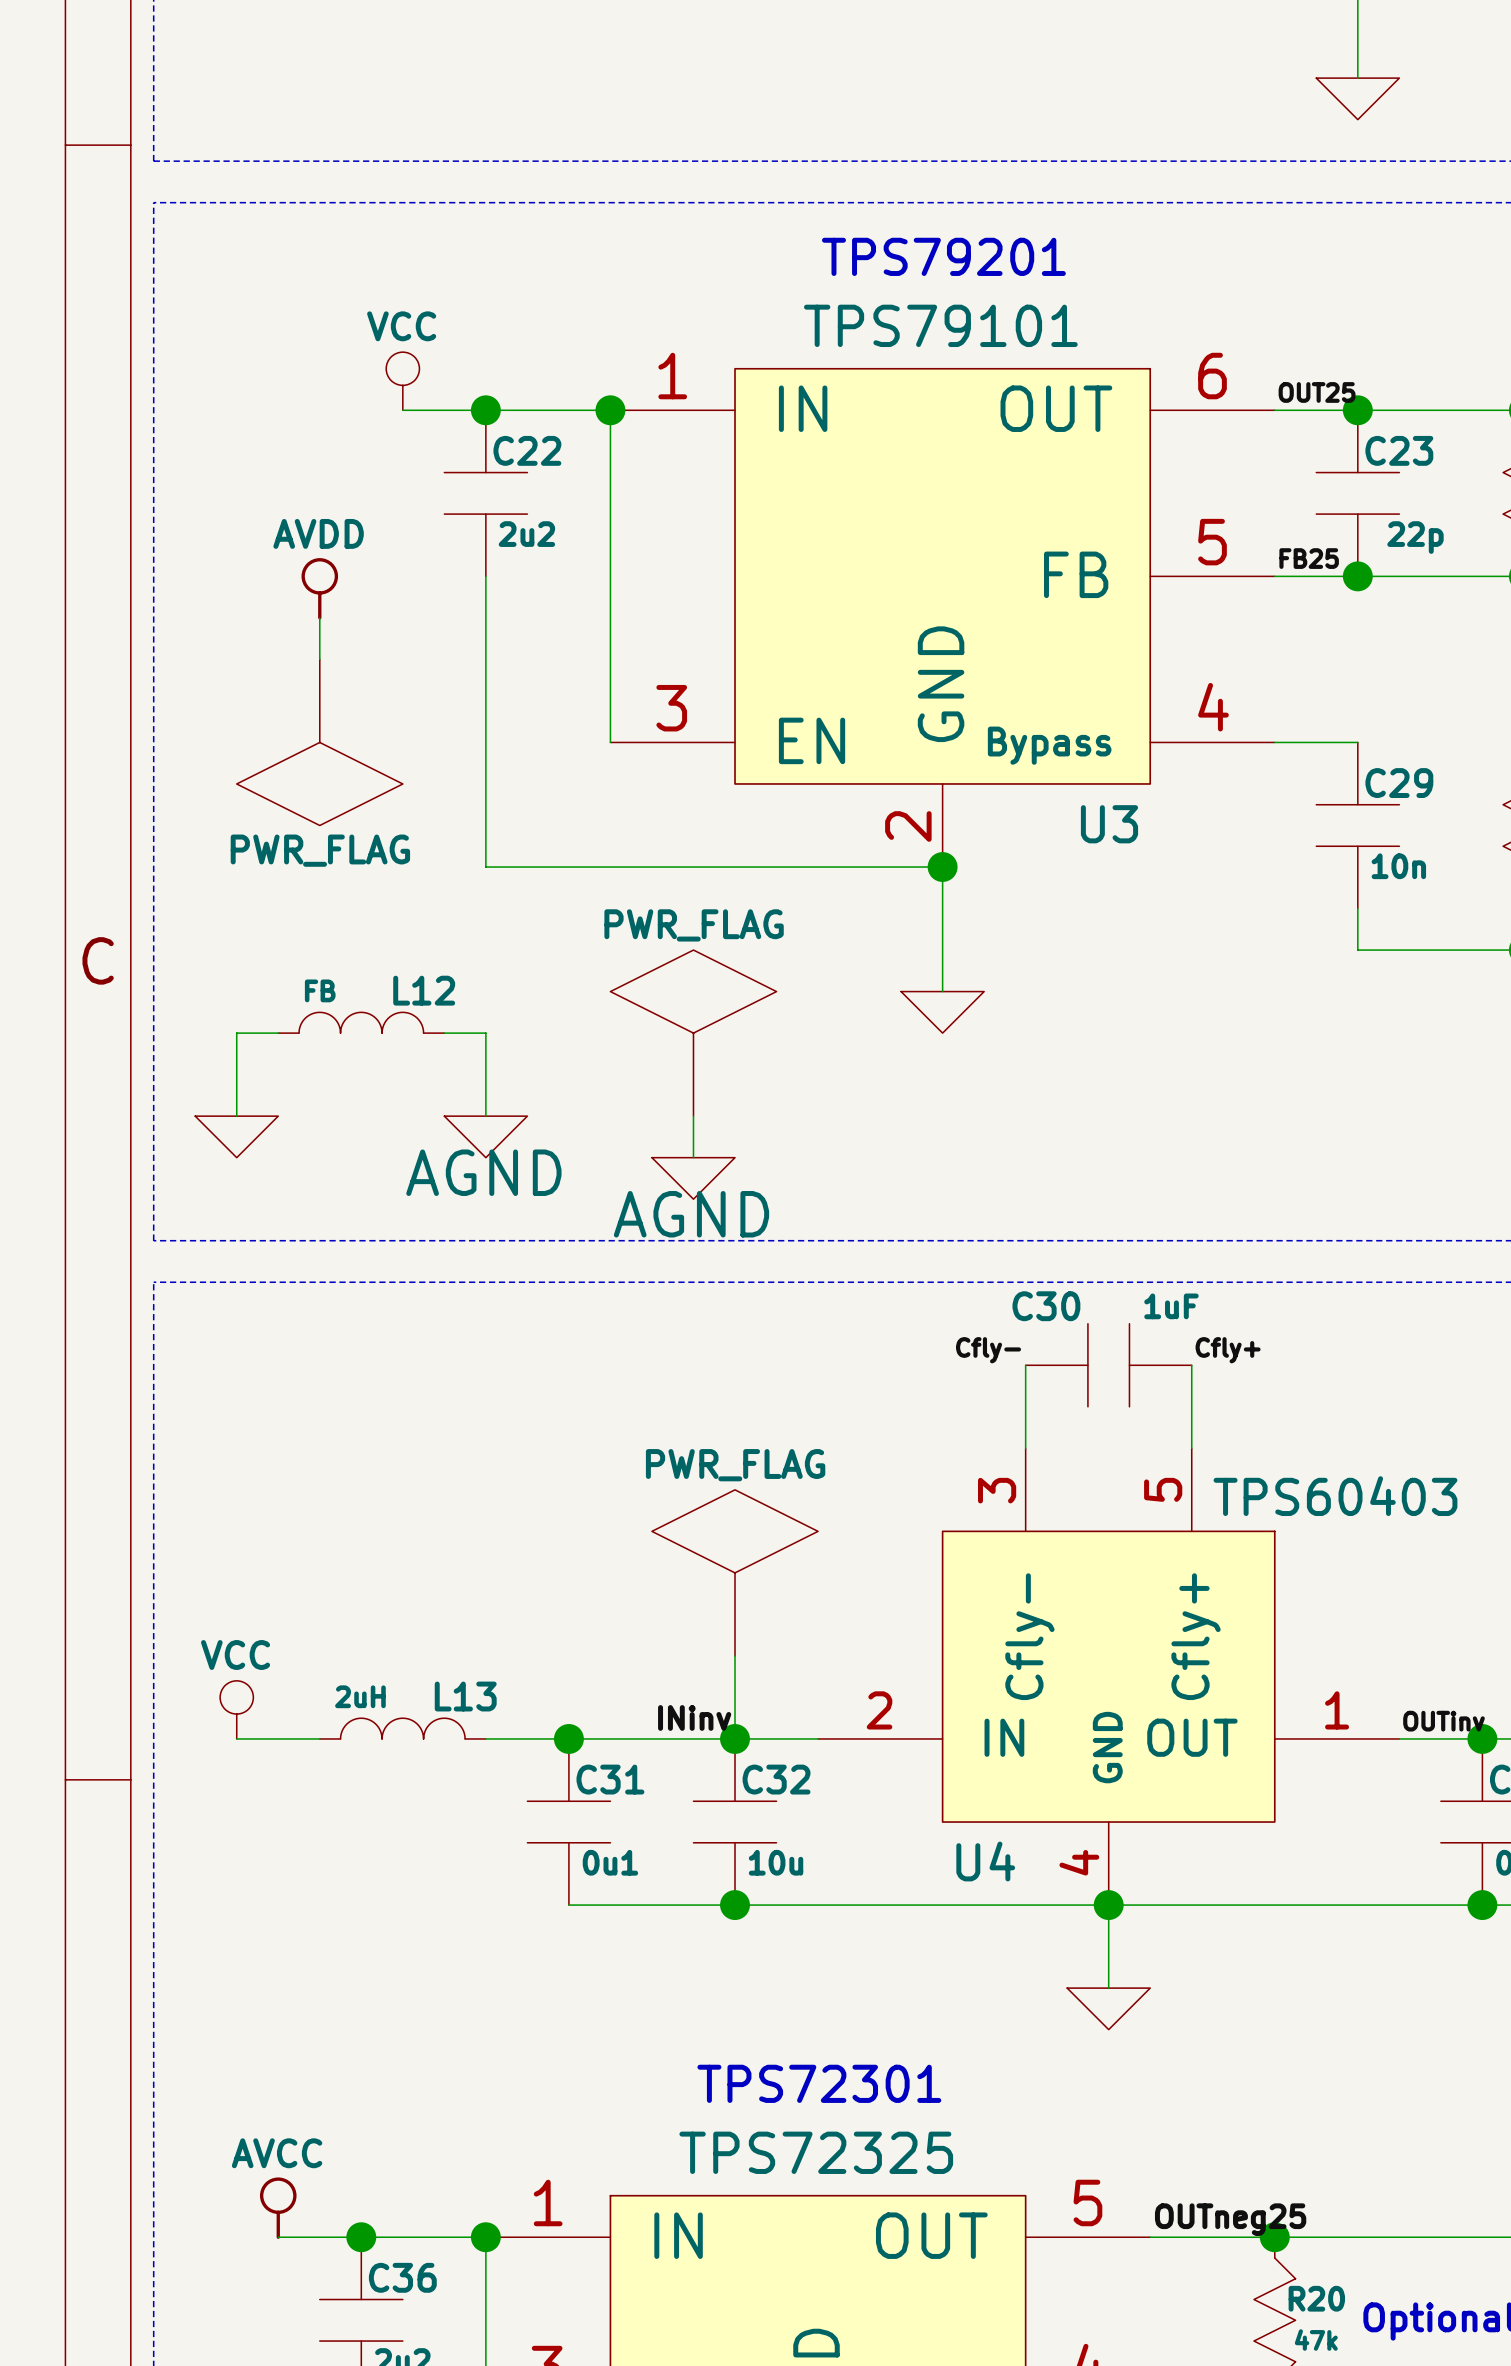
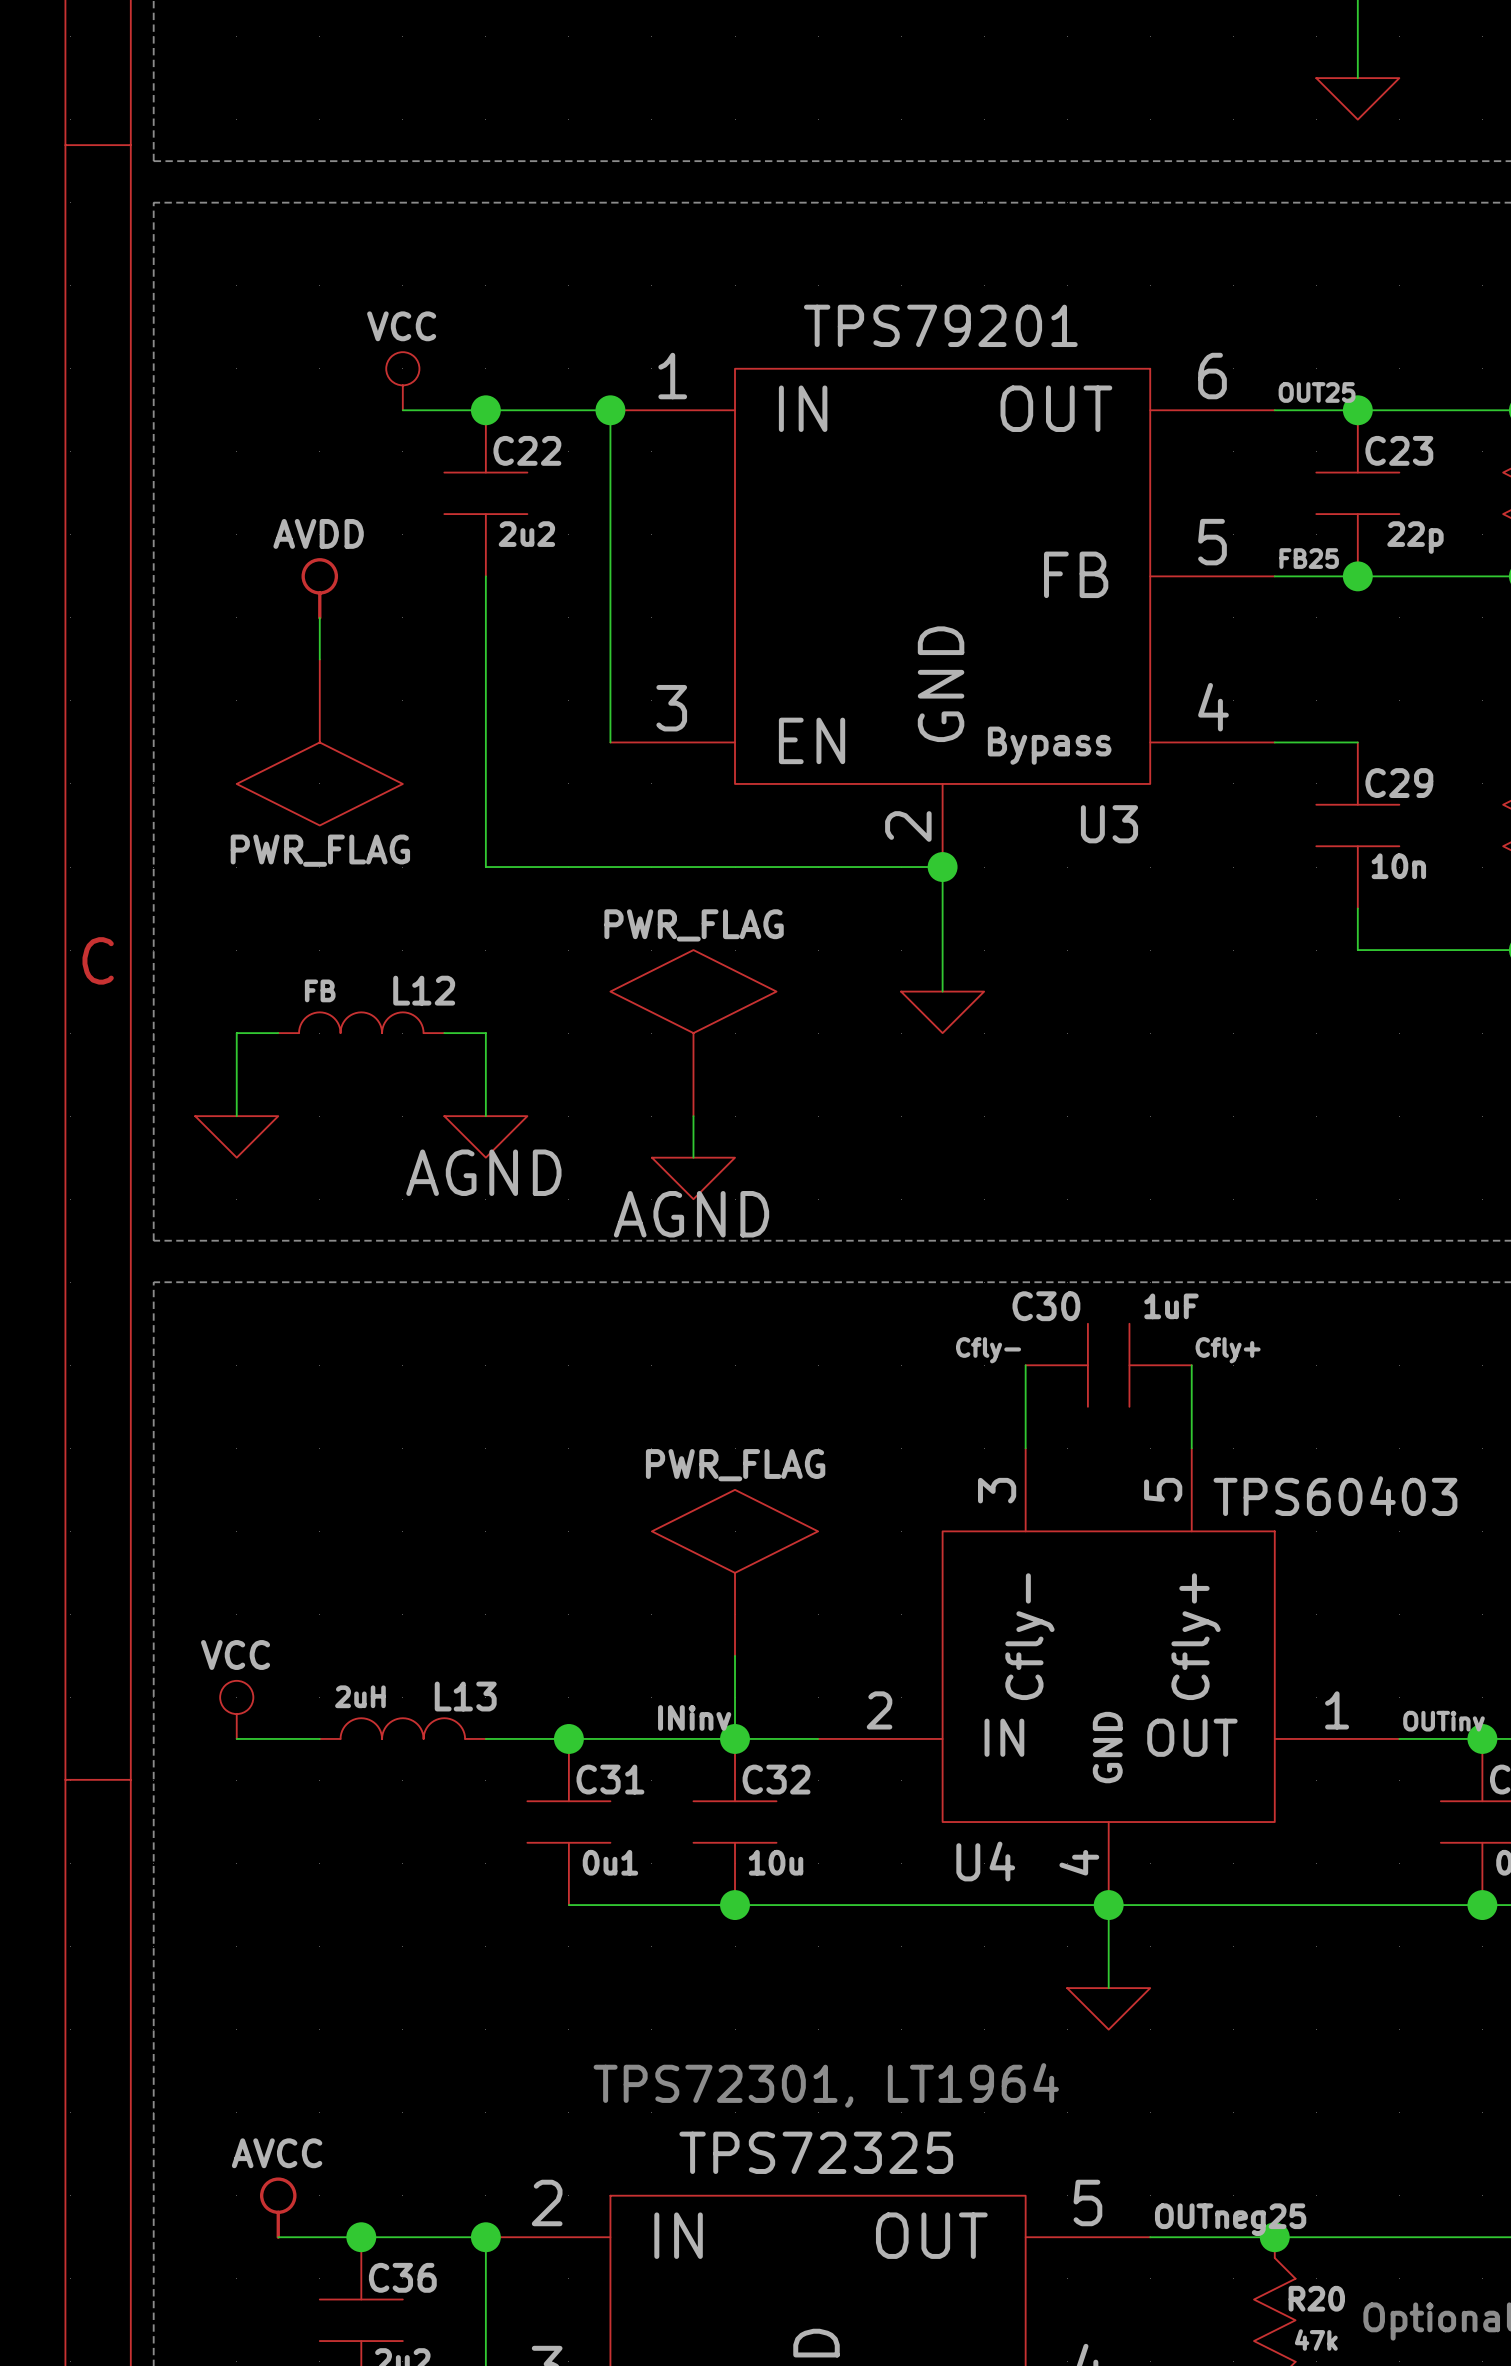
text: TPS79201 (943, 256) -> none
U3 value: TPS79101 (940, 325) -> TPS79201 (940, 325)
text: TPS72301 (819, 2083) -> TPS72301, LT1964 (826, 2085)
part pin number: 1 (548, 2202) -> 2 (547, 2202)

